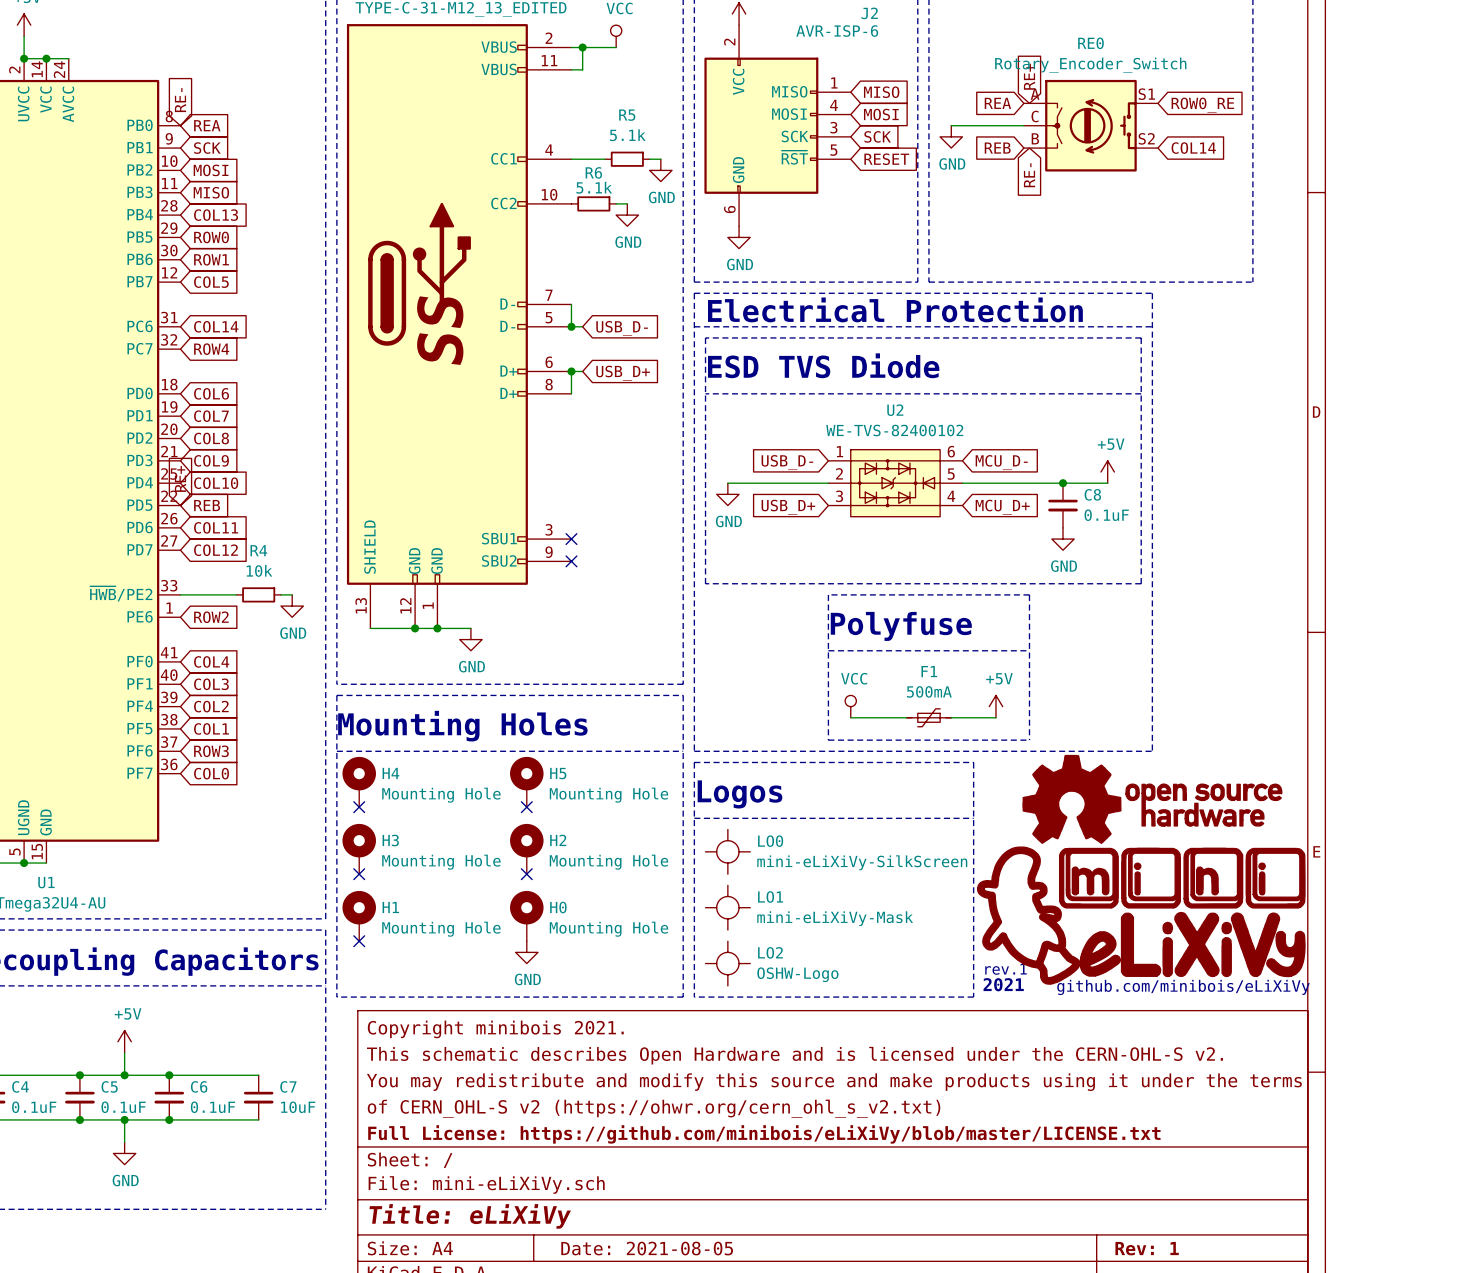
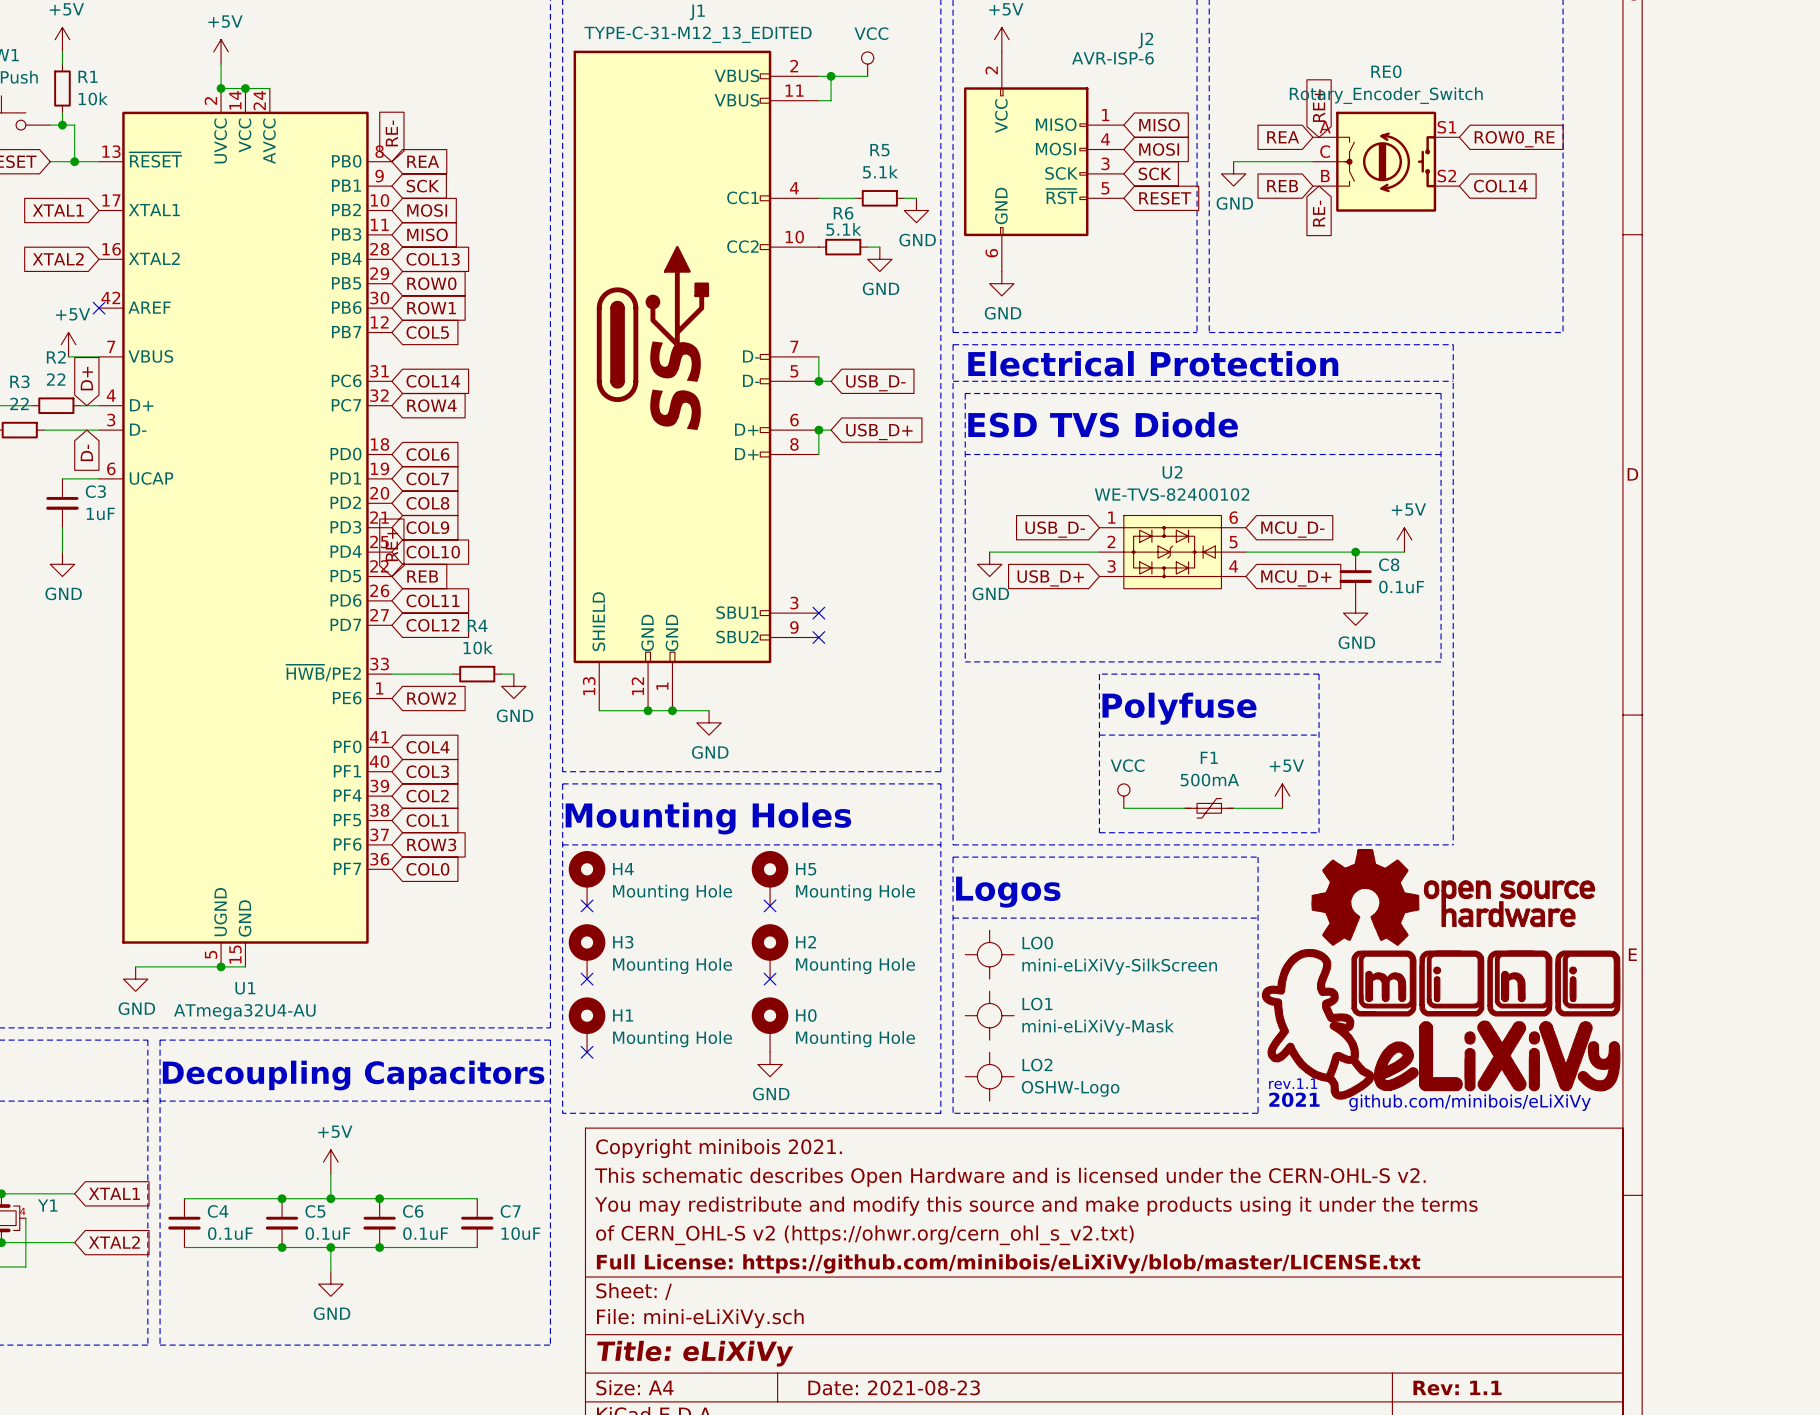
text: rev.1 (1005, 969) -> rev.1.1 (1293, 1083)
title block: Date: 2021-08-05 (647, 1248) -> Date: 2021-08-23 (894, 1387)
title block: Rev: 1 (1147, 1248) -> Rev: 1.1 (1457, 1388)

